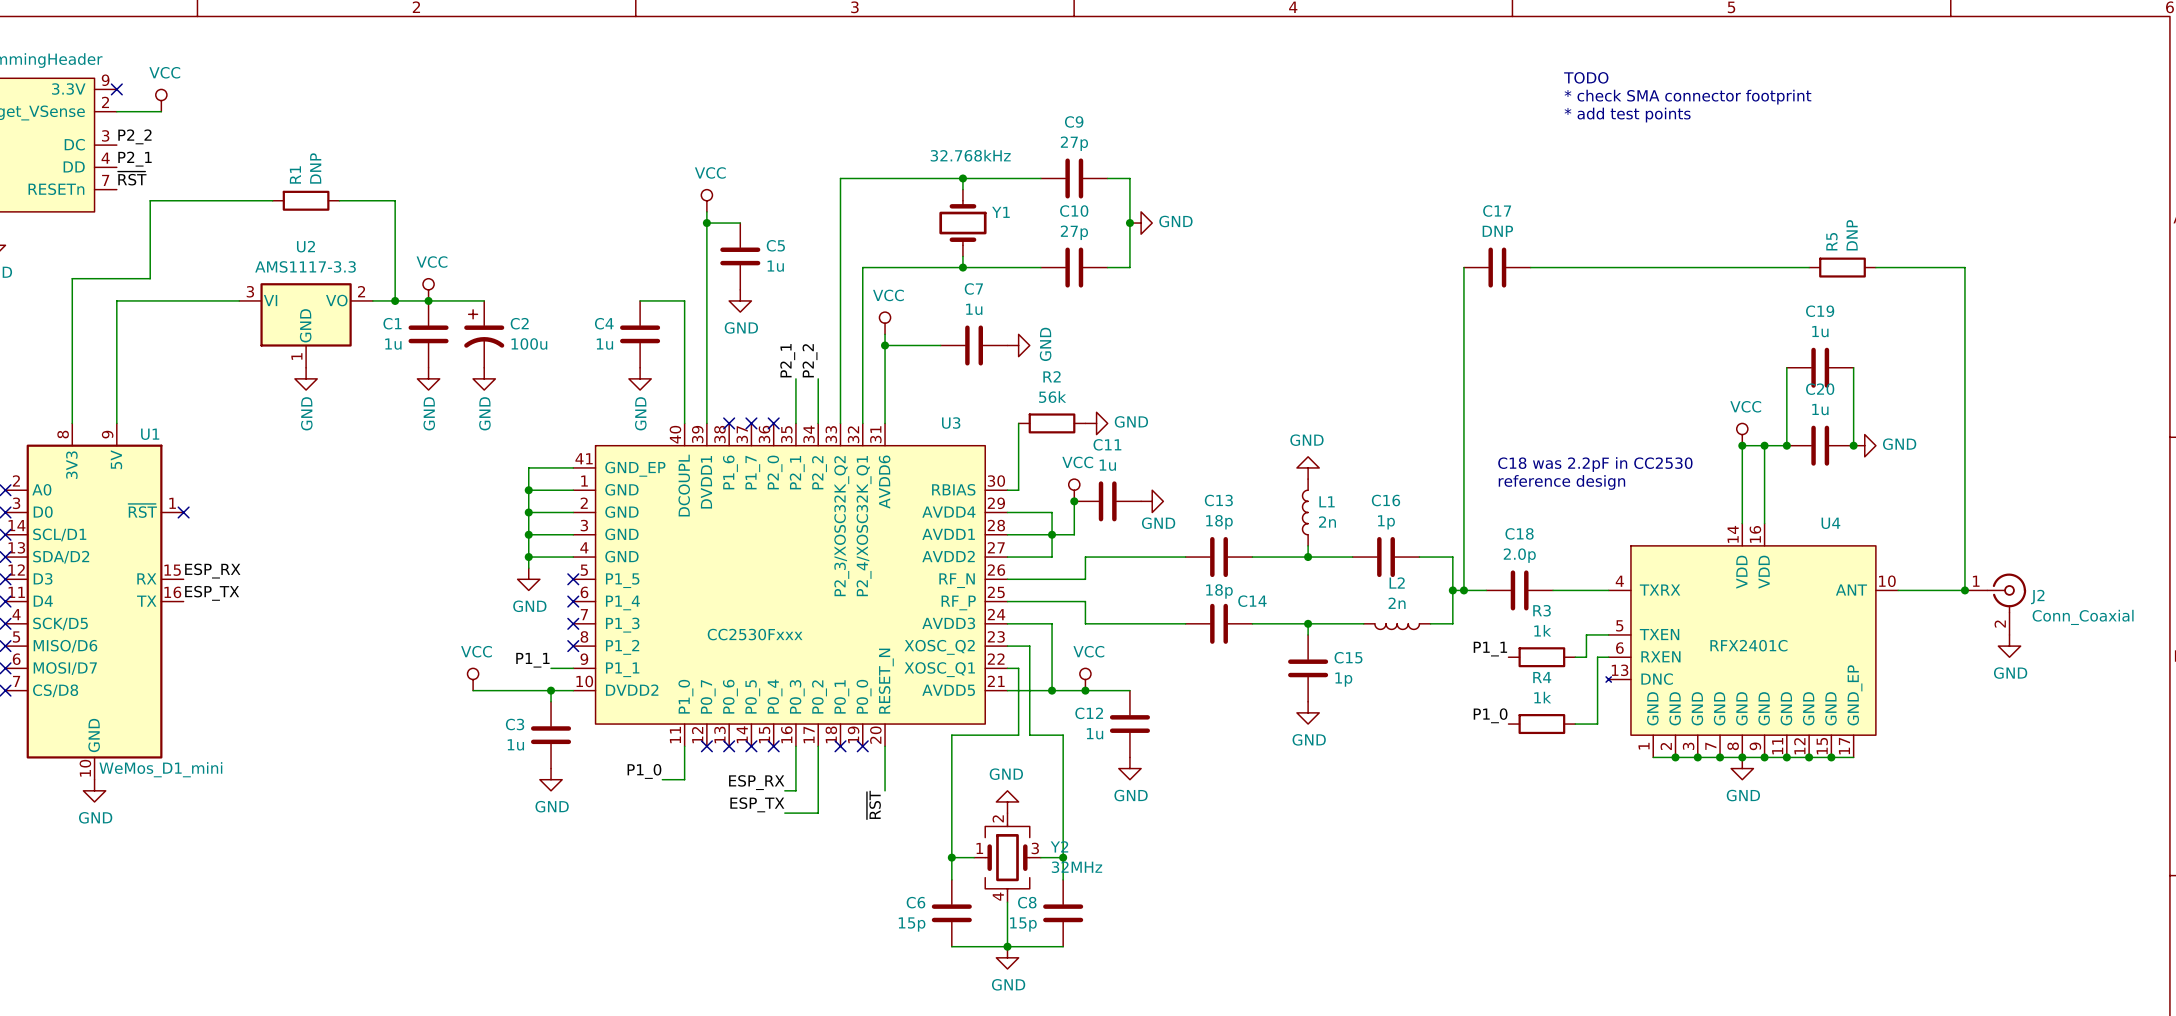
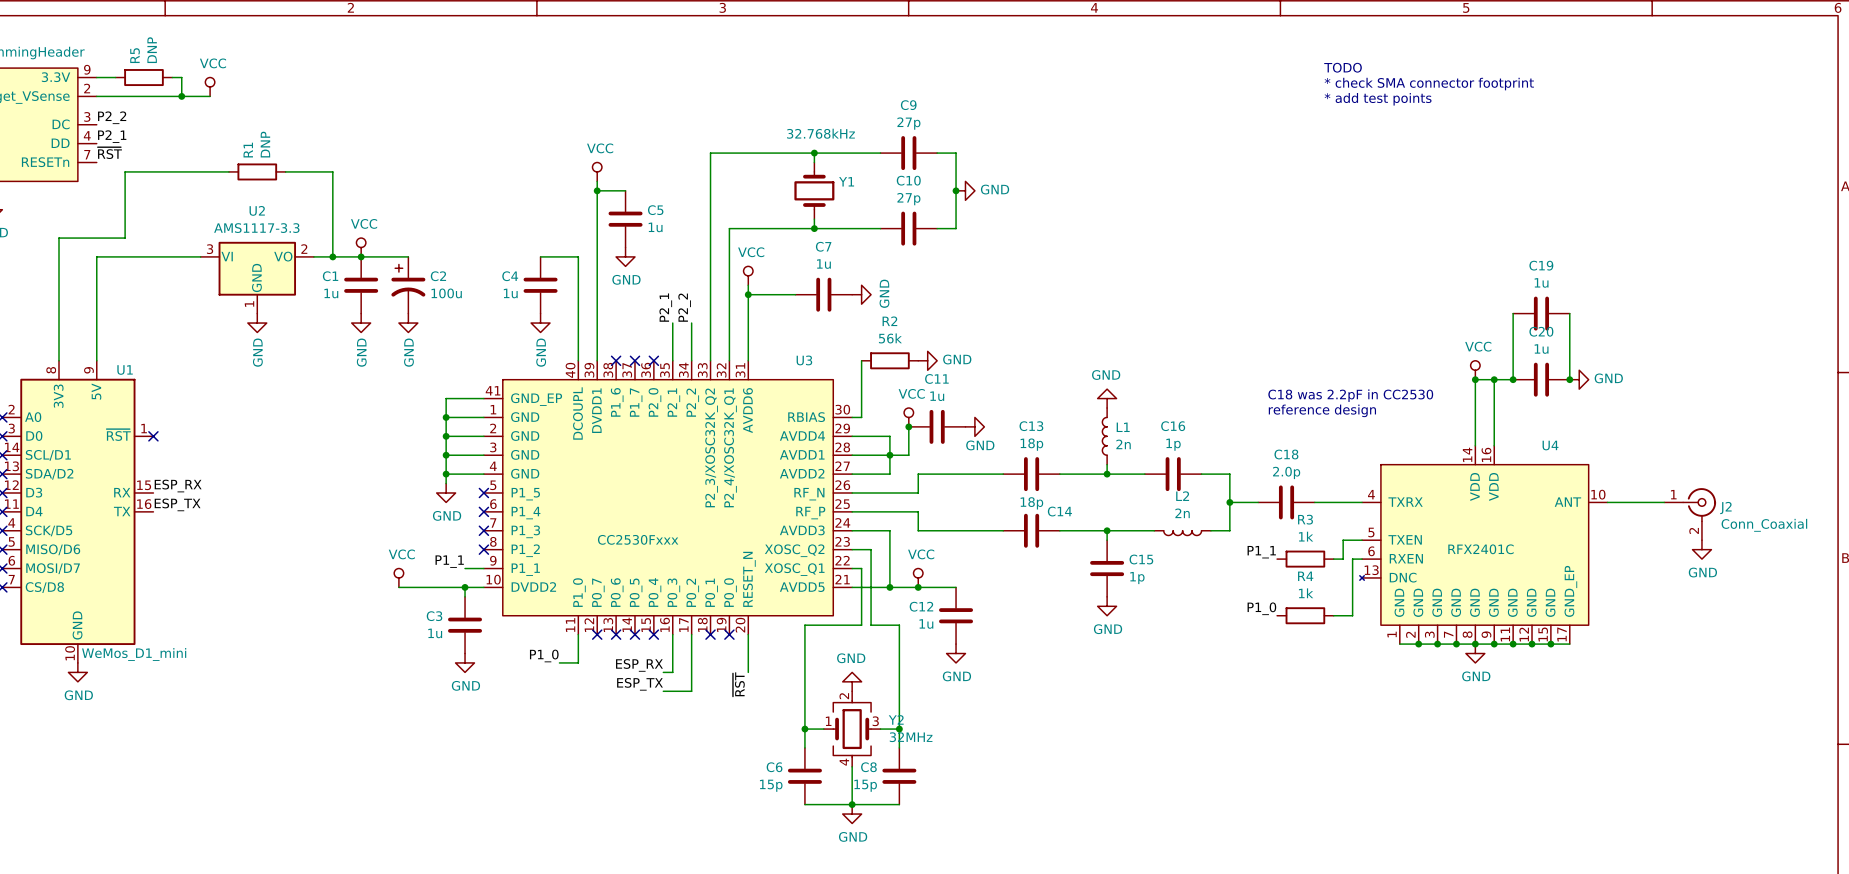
wire: none -> (96, 77) (115, 77)
no-connect mark: (116, 89) -> none
wire: none -> (172, 77) (181, 77) (181, 96)
power symbol position: VCC (161, 100) -> VCC (210, 86)
wire: none -> (134, 96) (210, 96)
junction: none -> (181, 96)
wire: (1463, 267) (1463, 590) -> none
C17: DNP (1497, 267) -> none
wire: (1530, 267) (1809, 267) -> none
R5 position: (1842, 267) -> (143, 77)
wire: (1875, 267) (1964, 267) (1964, 590) -> none
junction: (1463, 590) -> none
junction: (1964, 590) -> none

